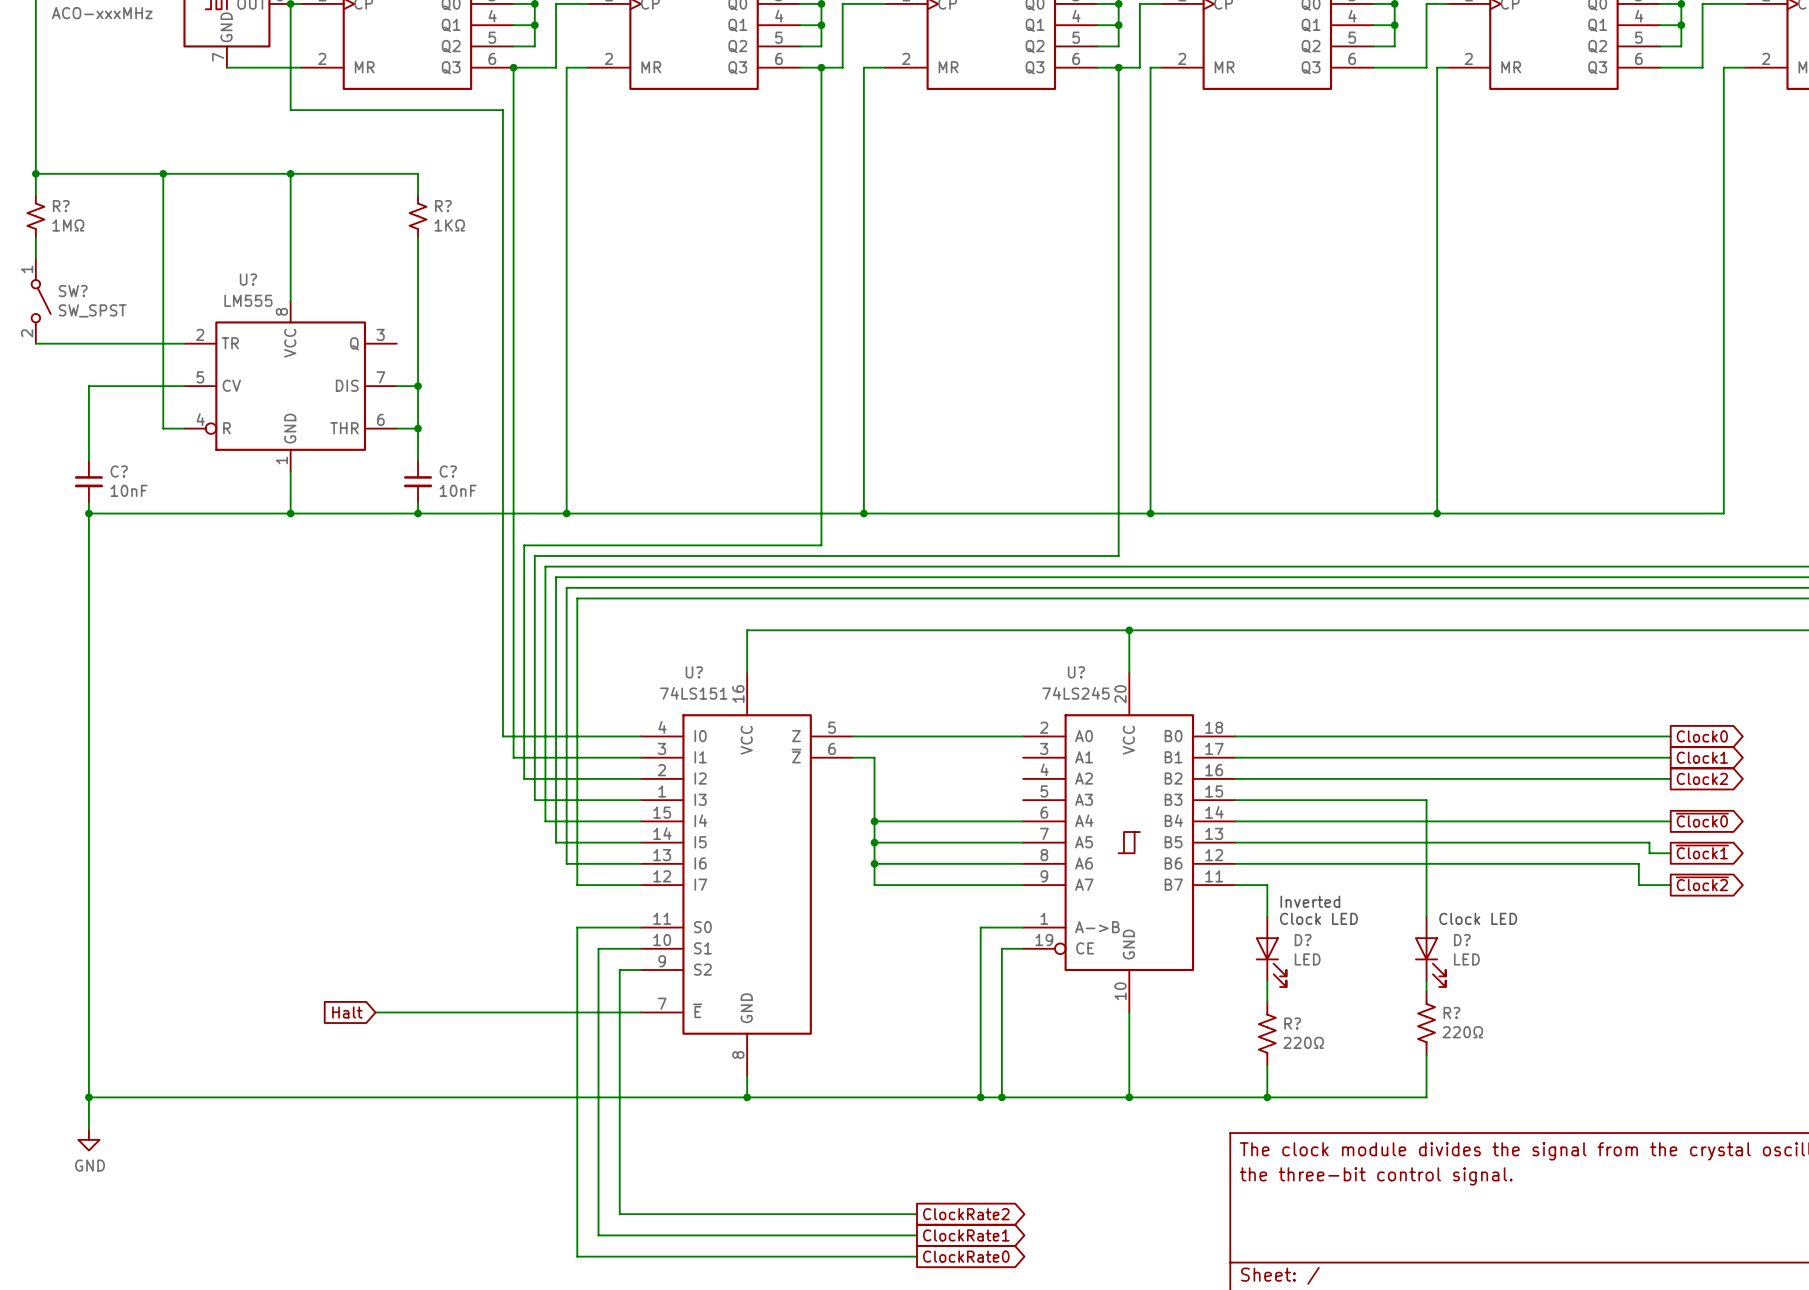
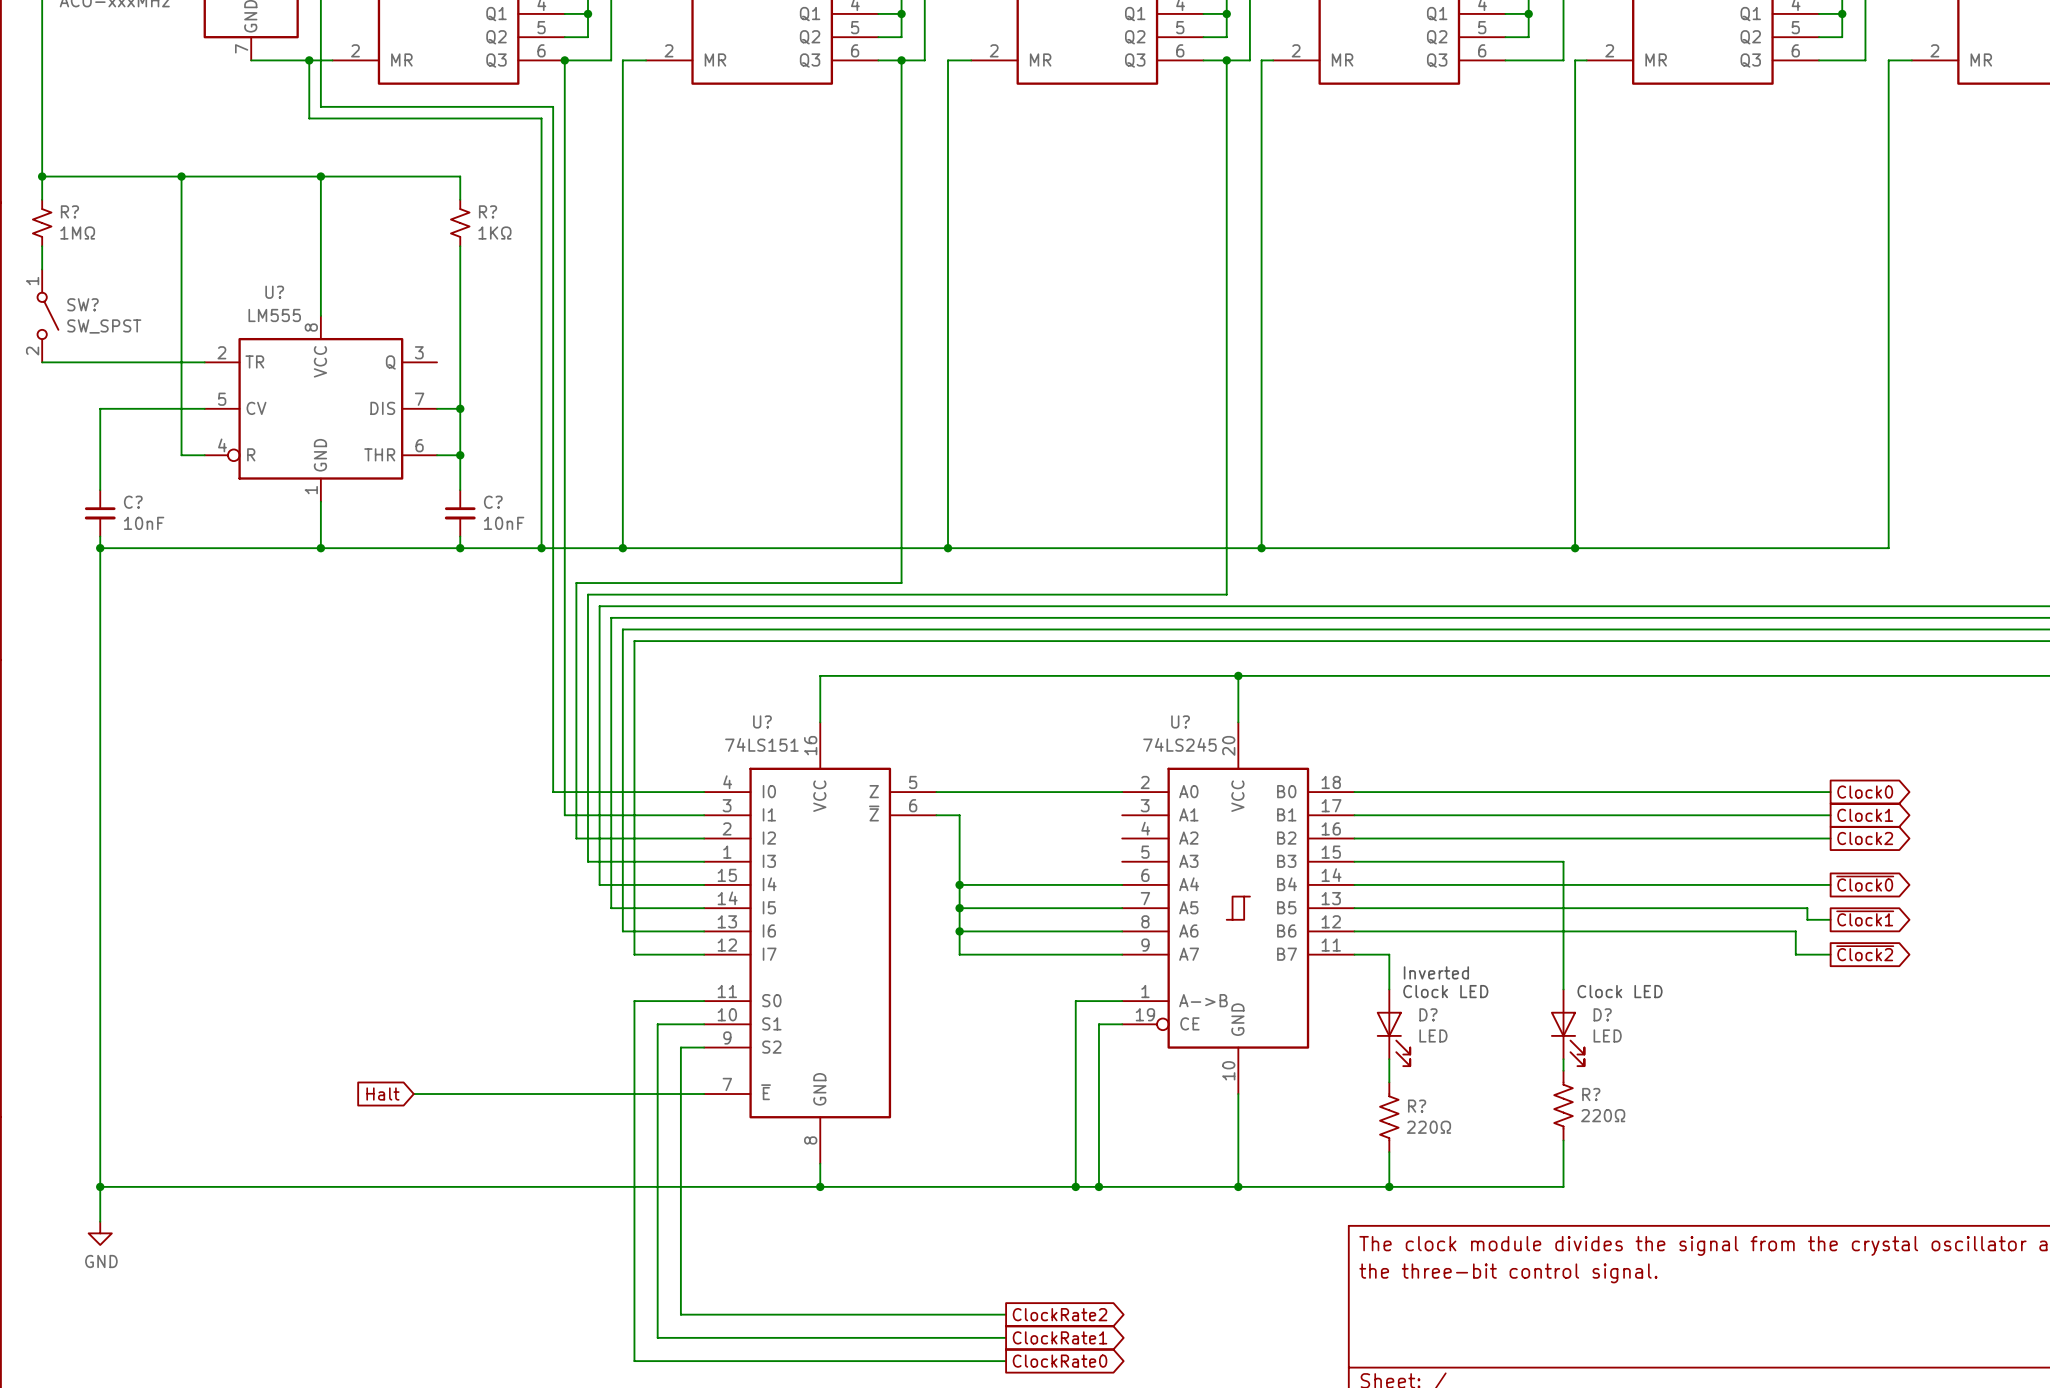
wire: none -> (309, 60) (309, 118) (541, 118) (541, 548)
junction: none -> (309, 60)
junction: none -> (541, 548)

